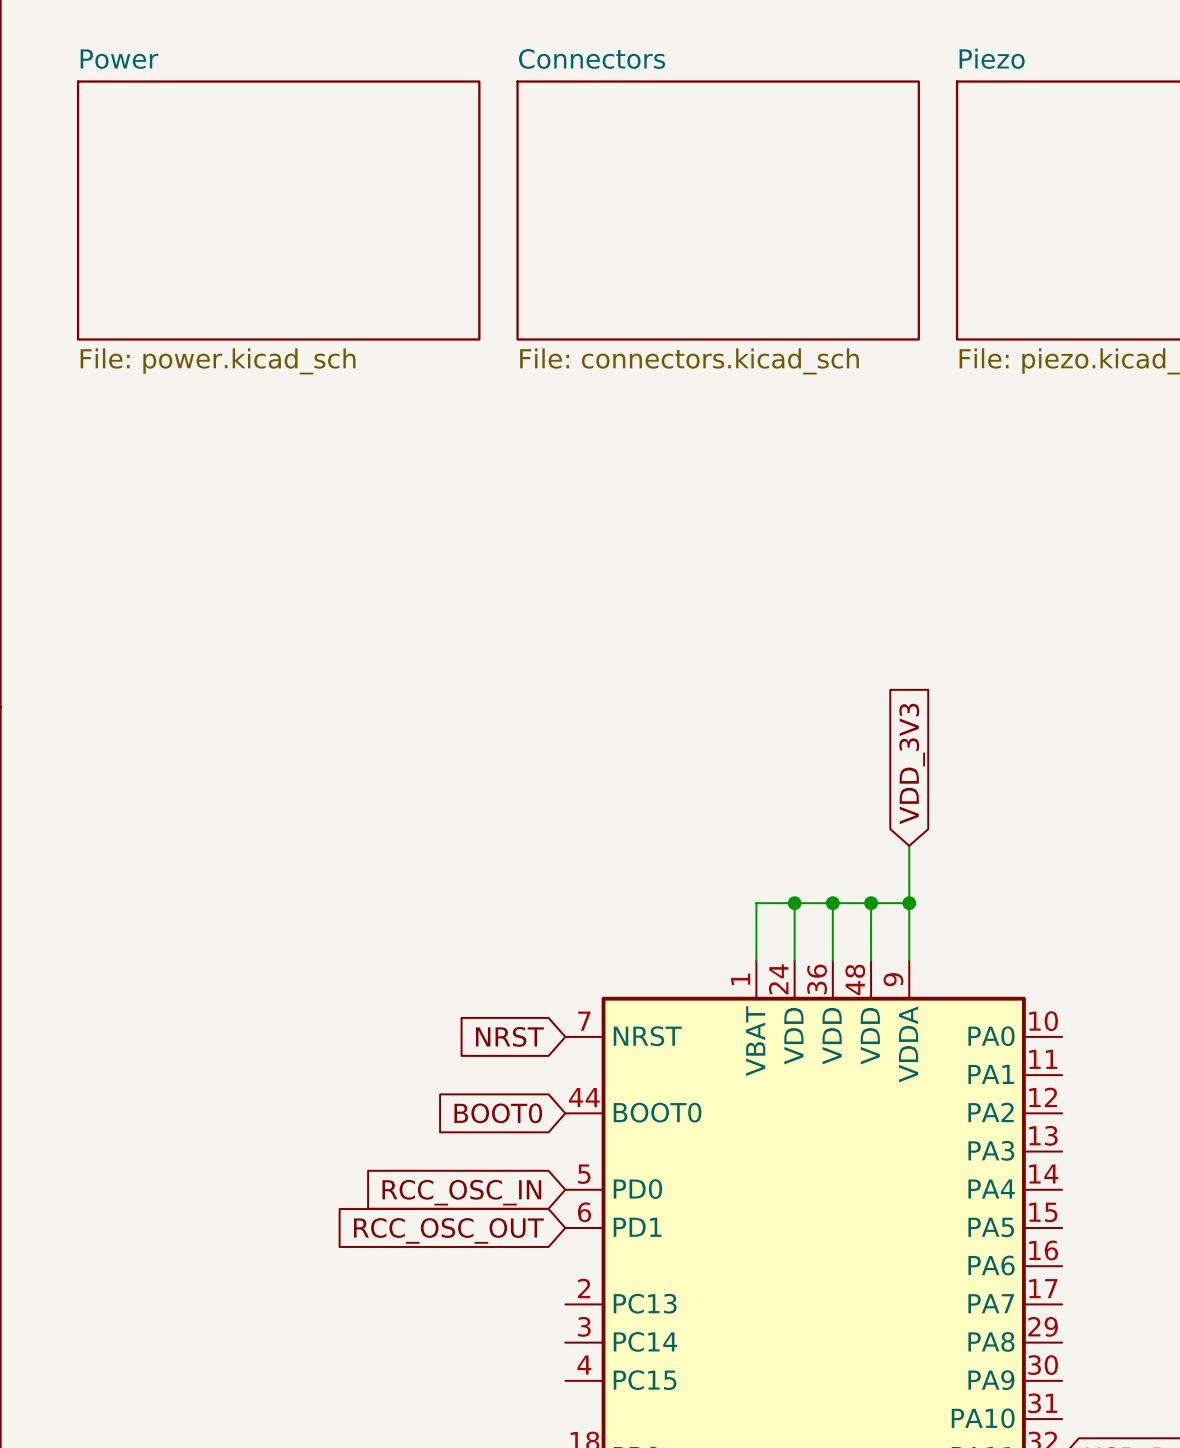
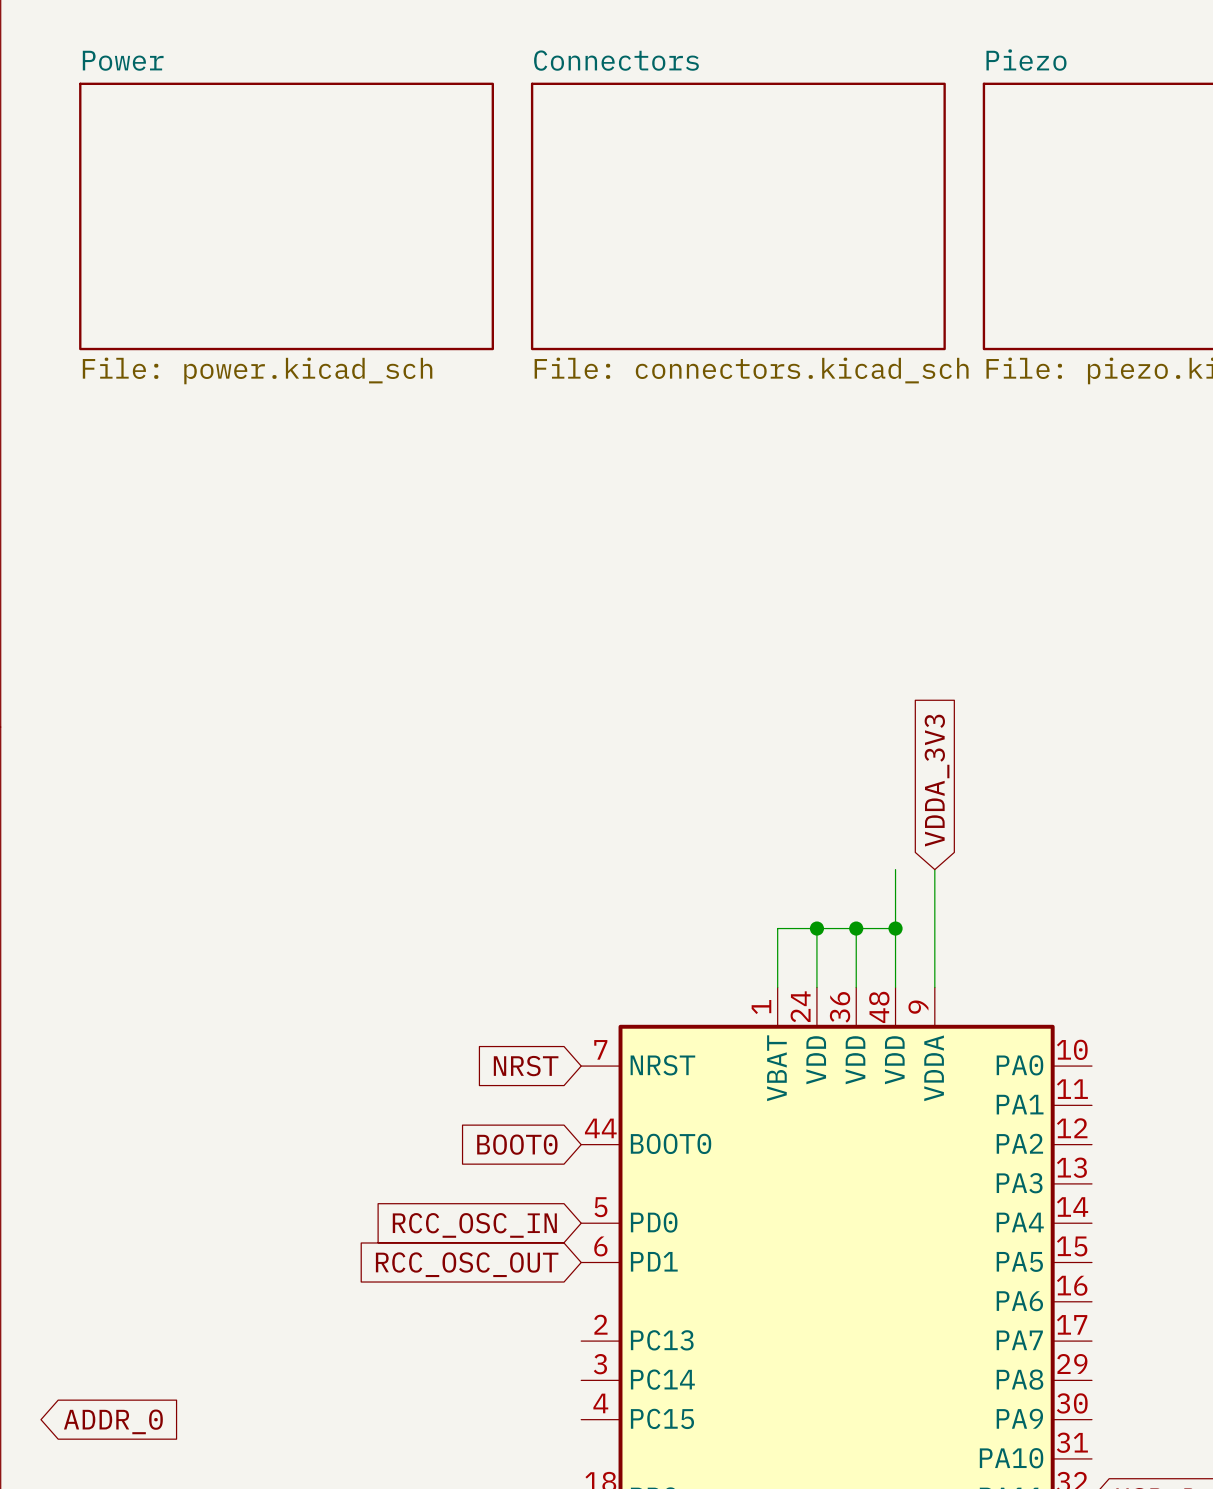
global label: VDD_3V3 (912, 763) -> VDDA_3V3 (937, 780)
wire: (871, 903) (909, 903) -> (895, 928) (895, 869)
junction: (909, 903) -> none
global label: none -> ADDR_0 (113, 1421)

